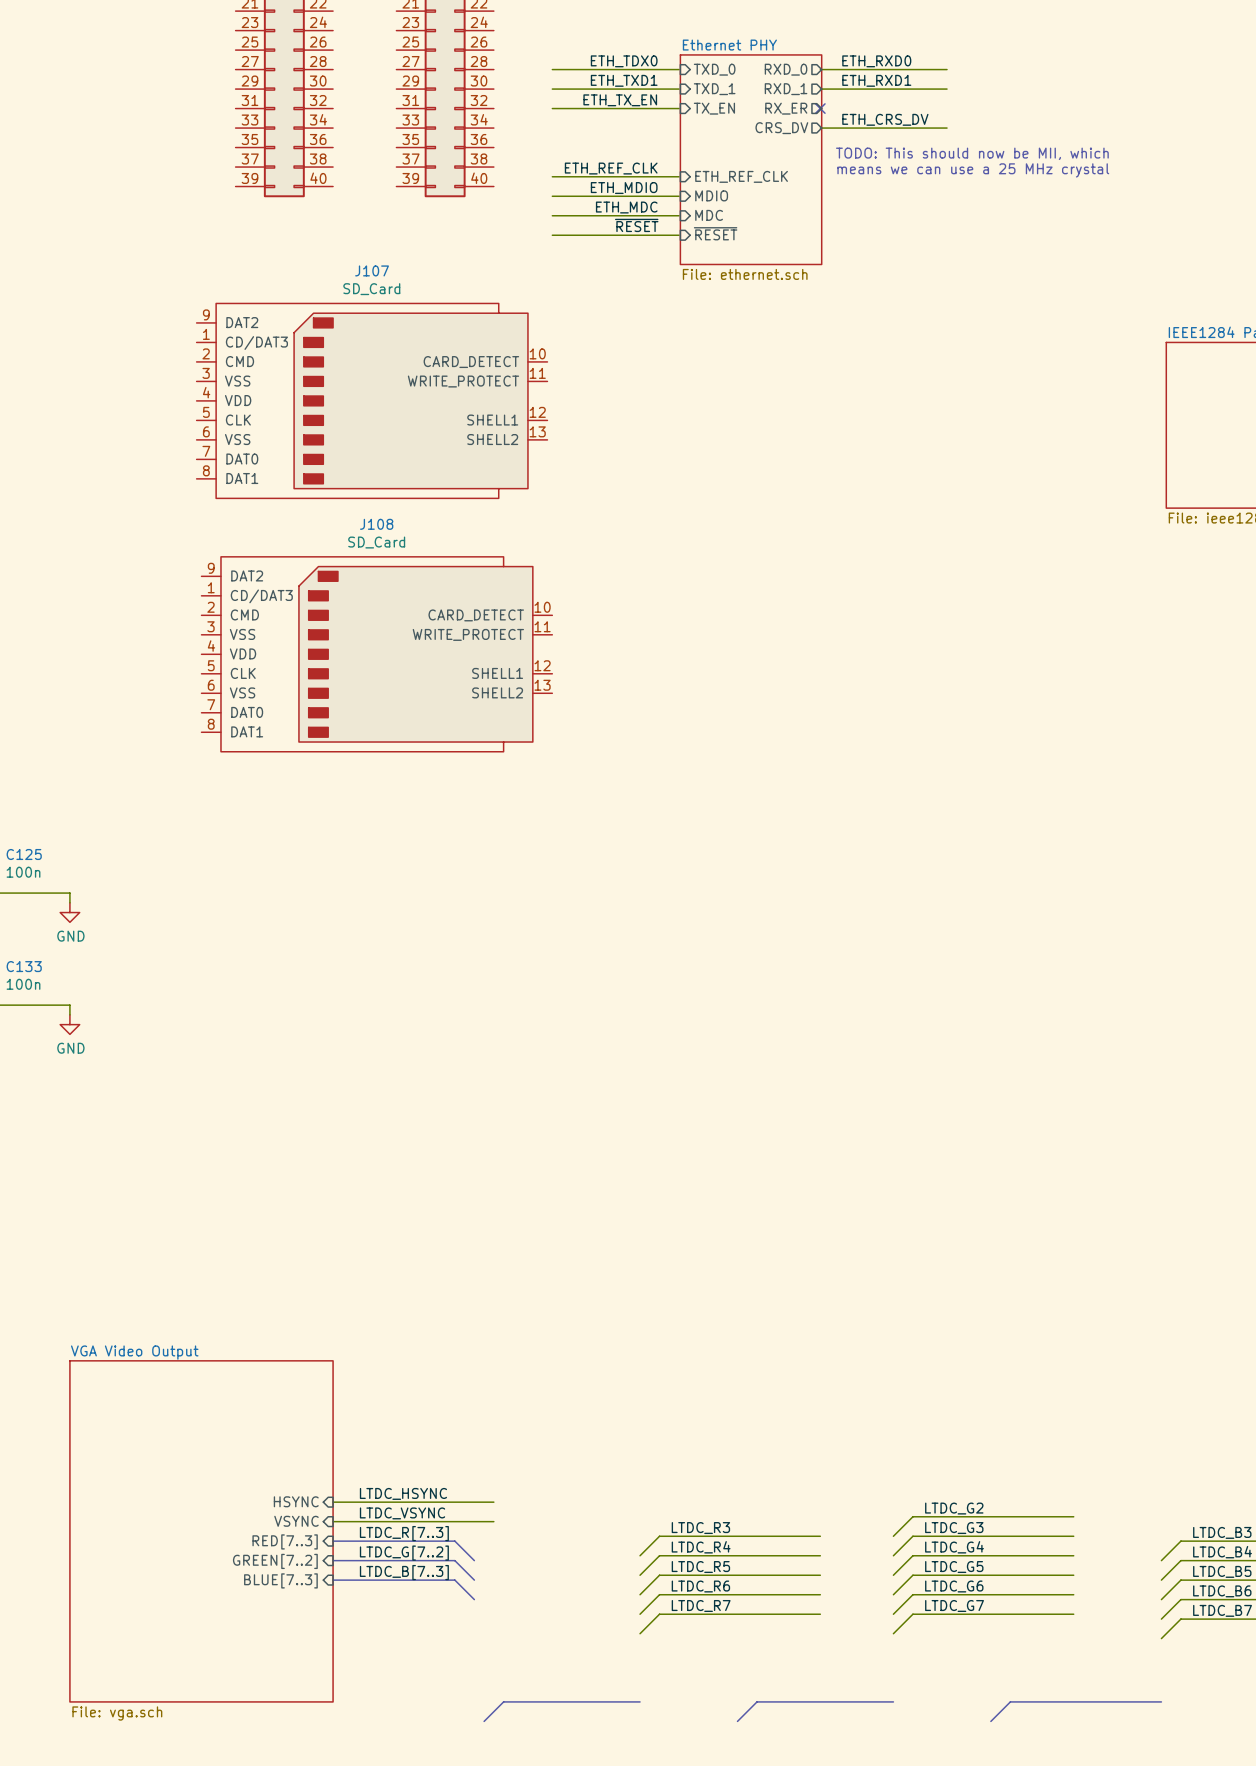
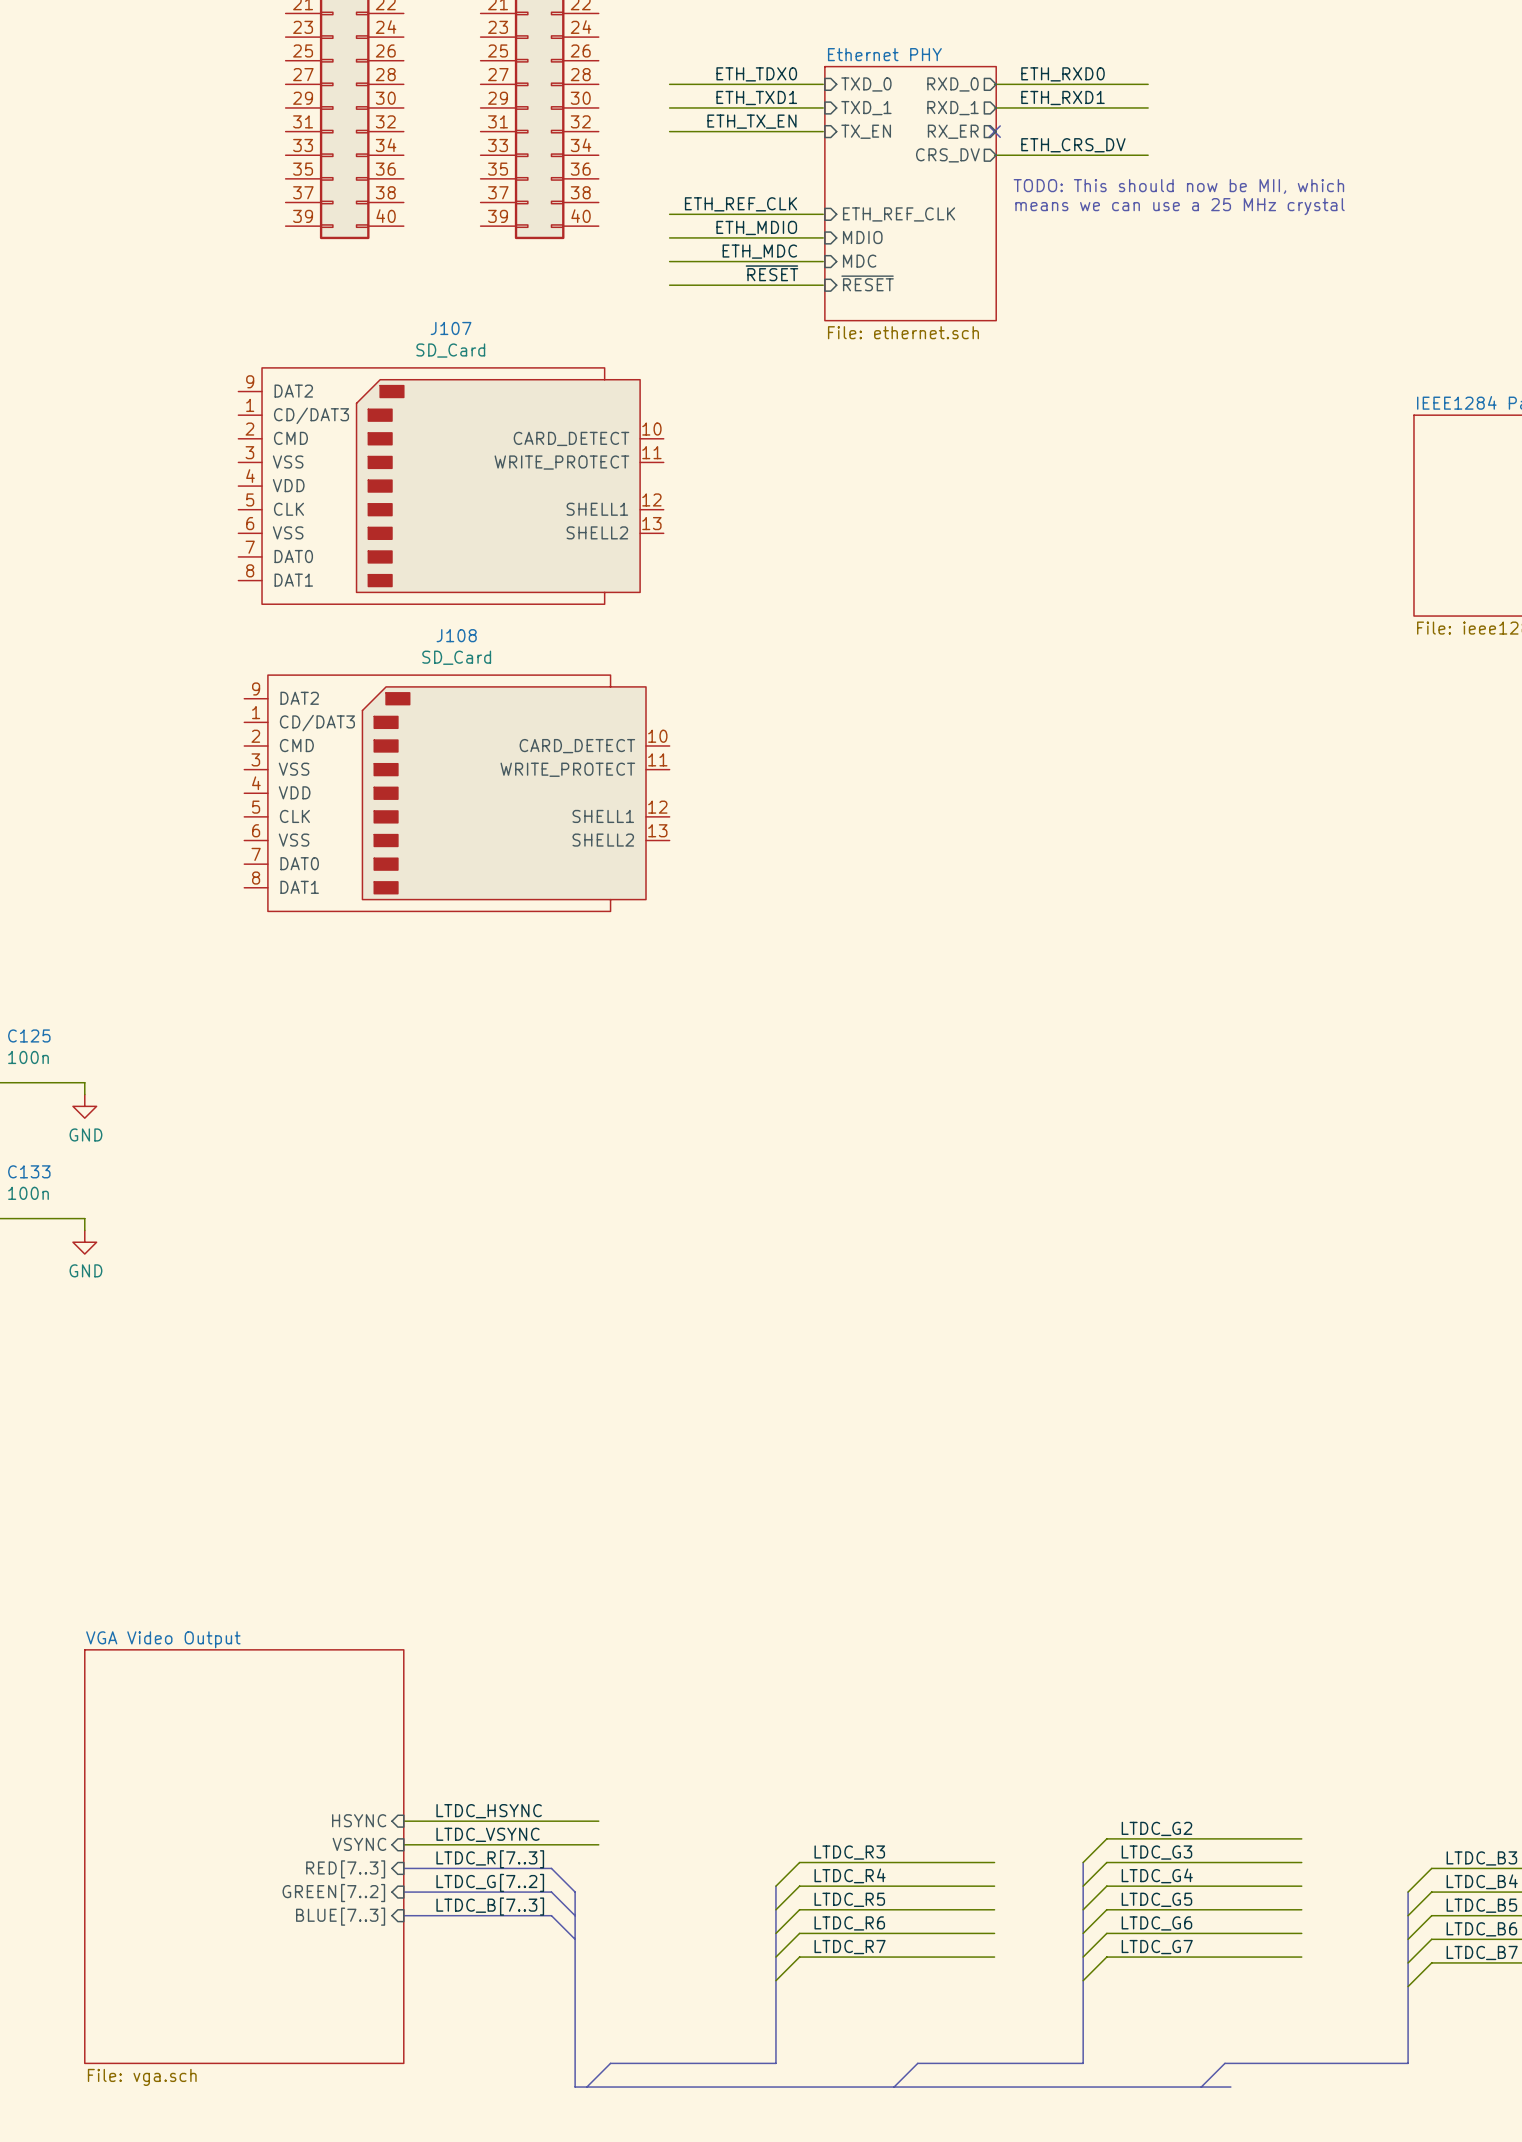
bus: none -> (1083, 1862) (1083, 2063)
bus: none -> (775, 1886) (775, 2063)
bus: none -> (575, 1892) (575, 2087) (1230, 2087)
bus: none -> (1408, 1892) (1408, 2063)

